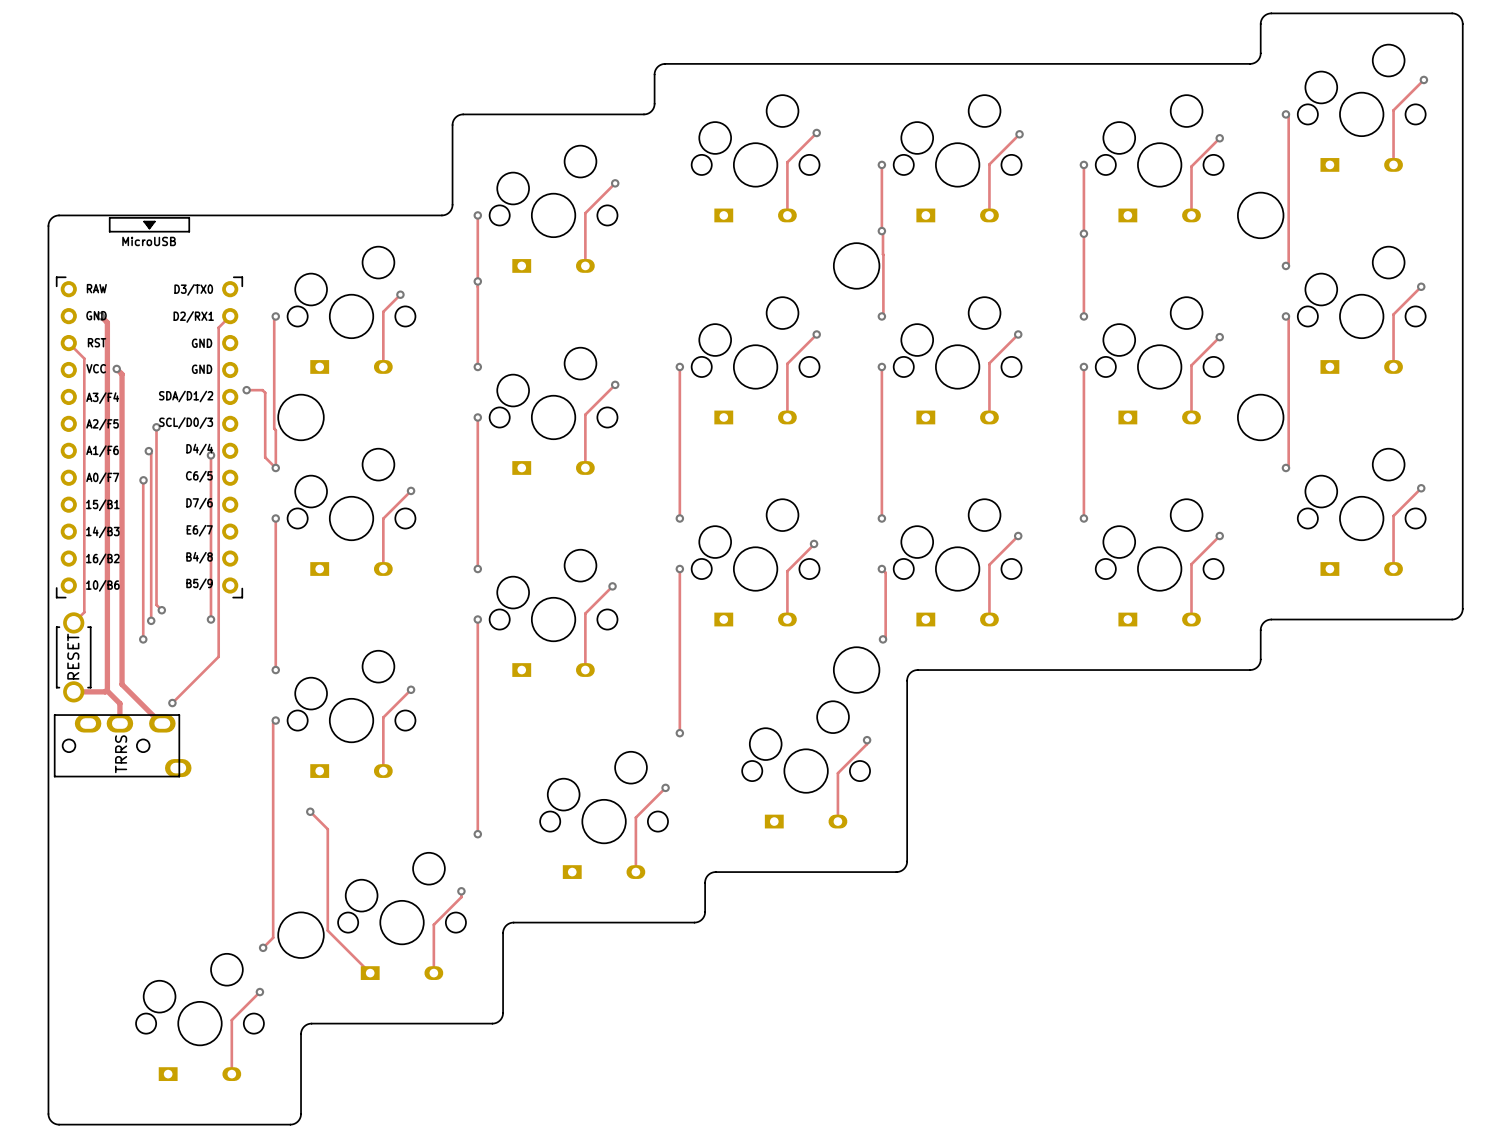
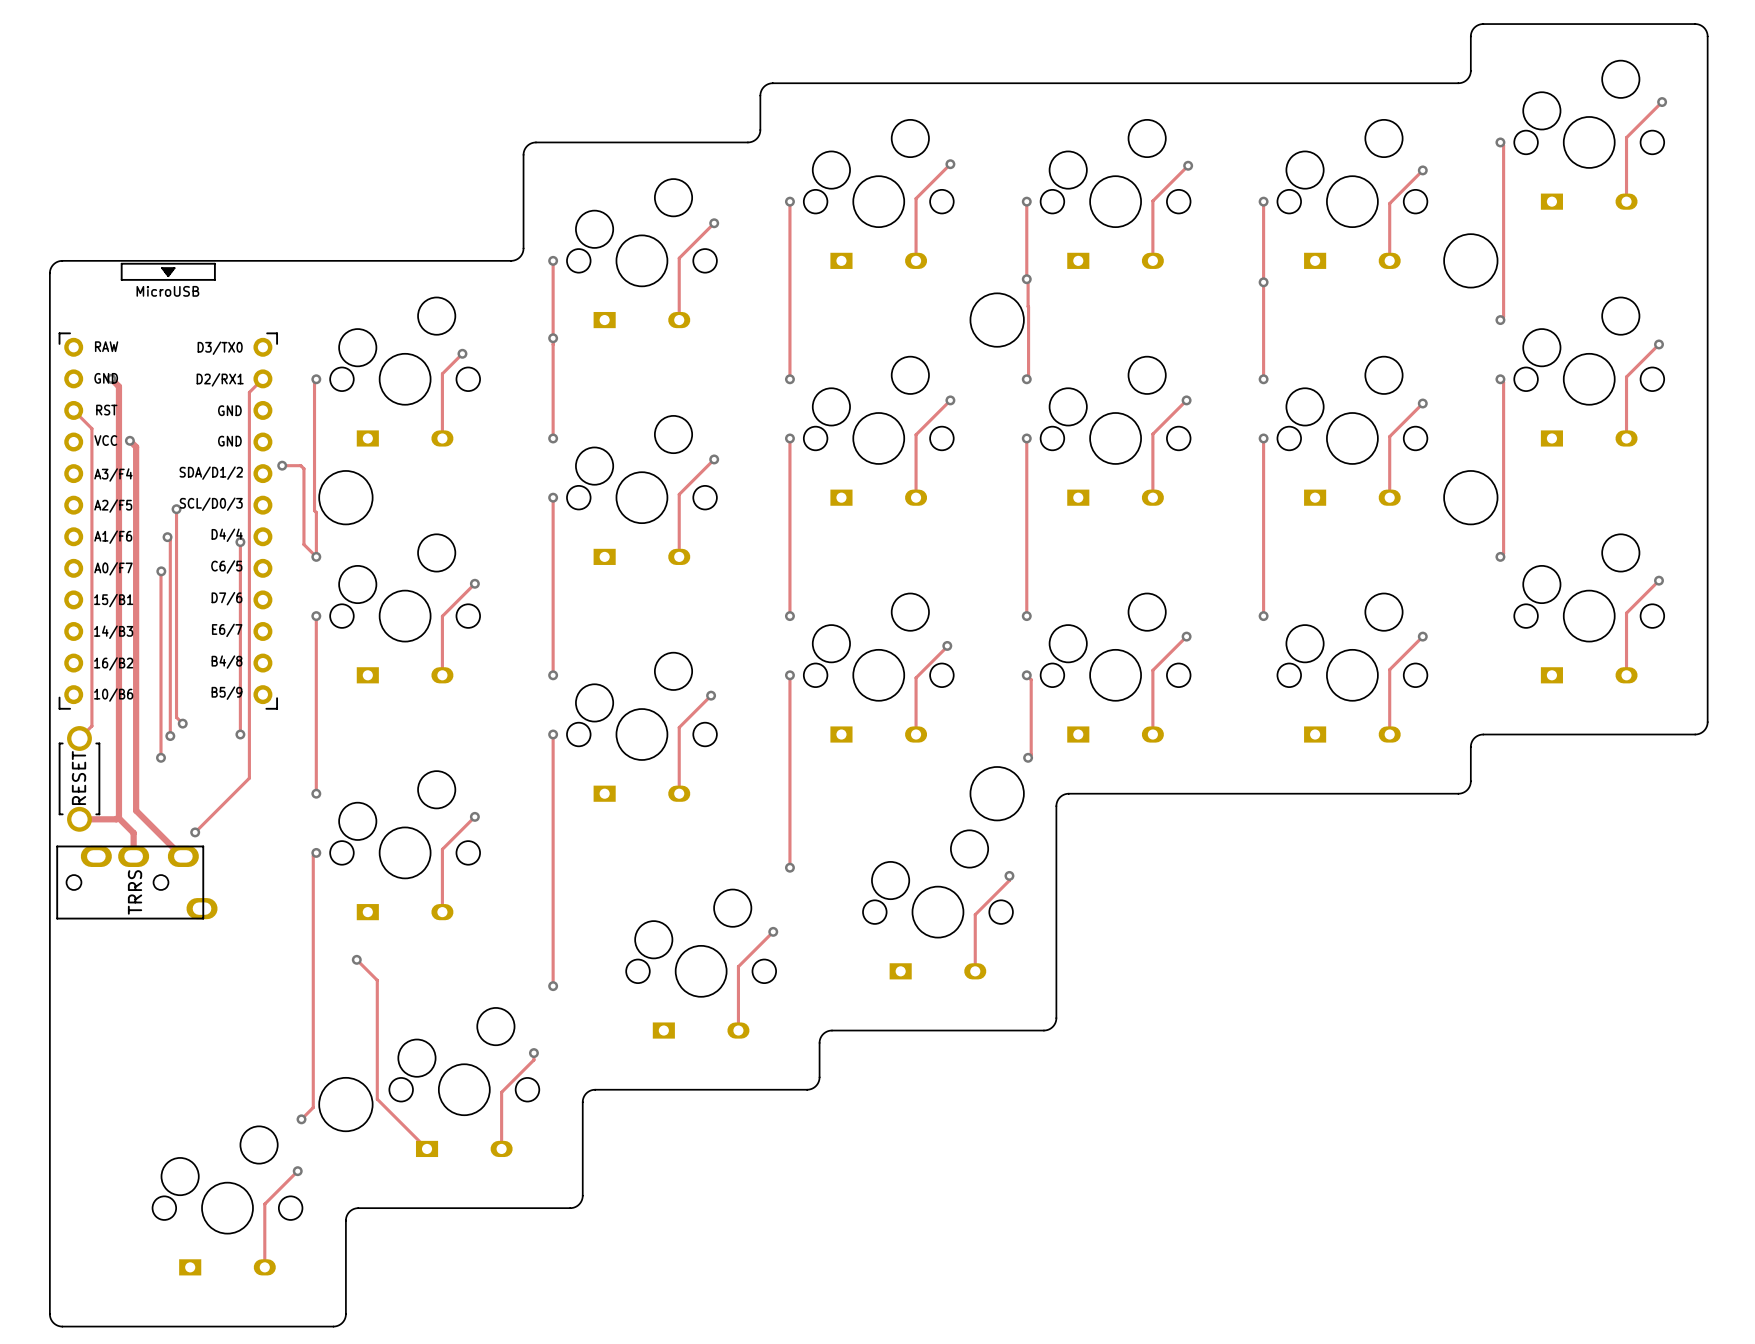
track: none -> (789, 201) (789, 379)
via: none -> (789, 201)
via: none -> (789, 379)

